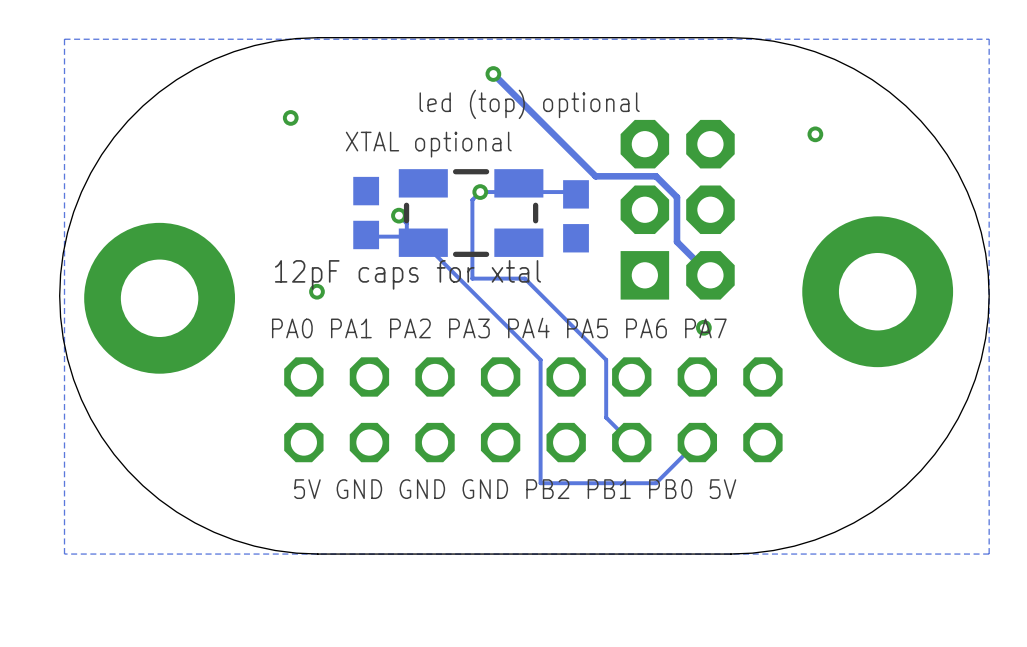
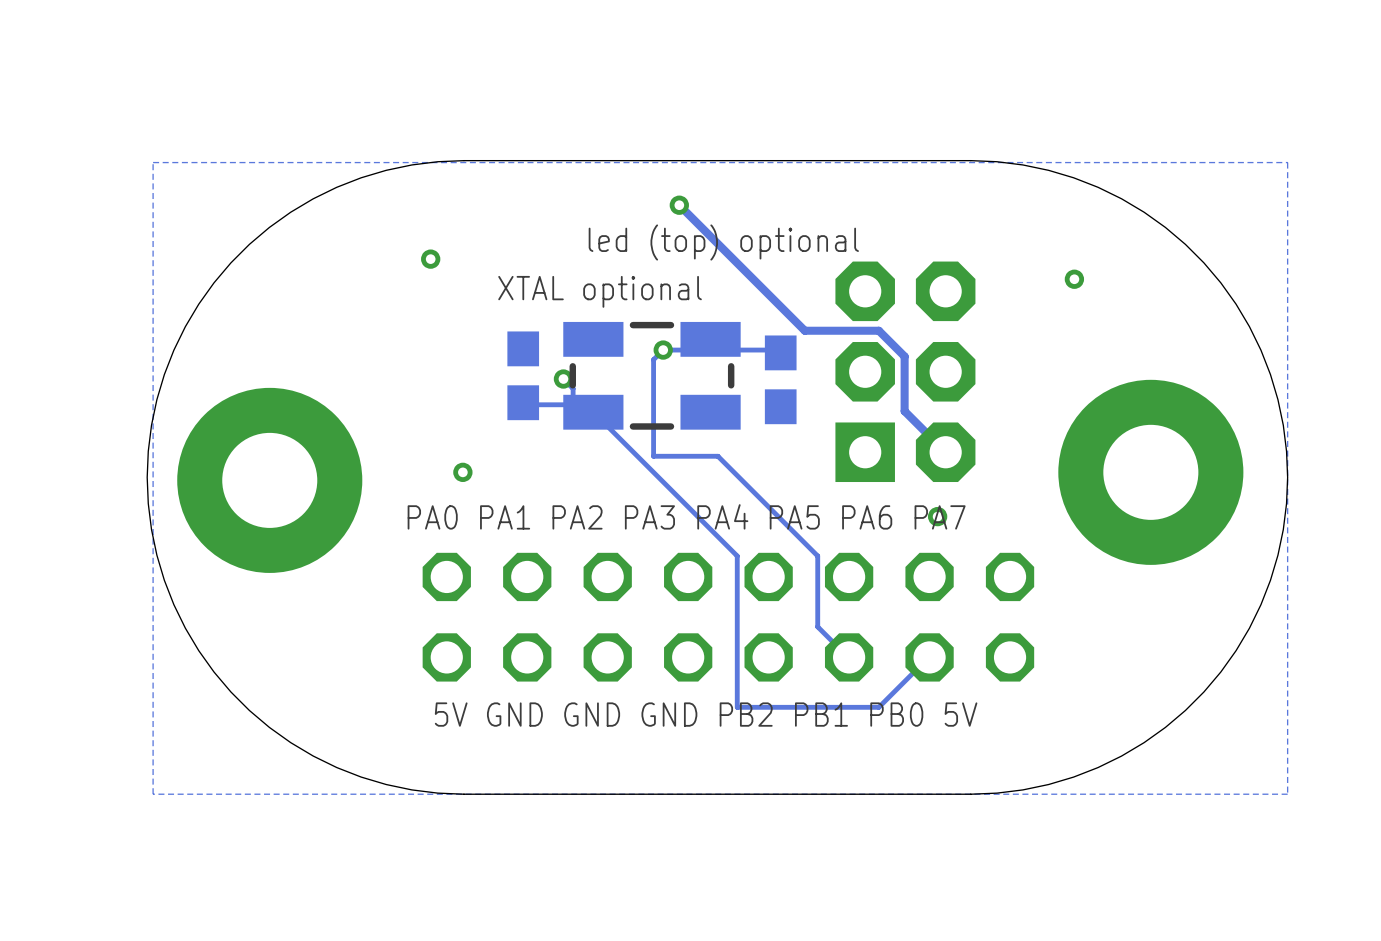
text: 12pF caps for xtal (407, 274) -> none

